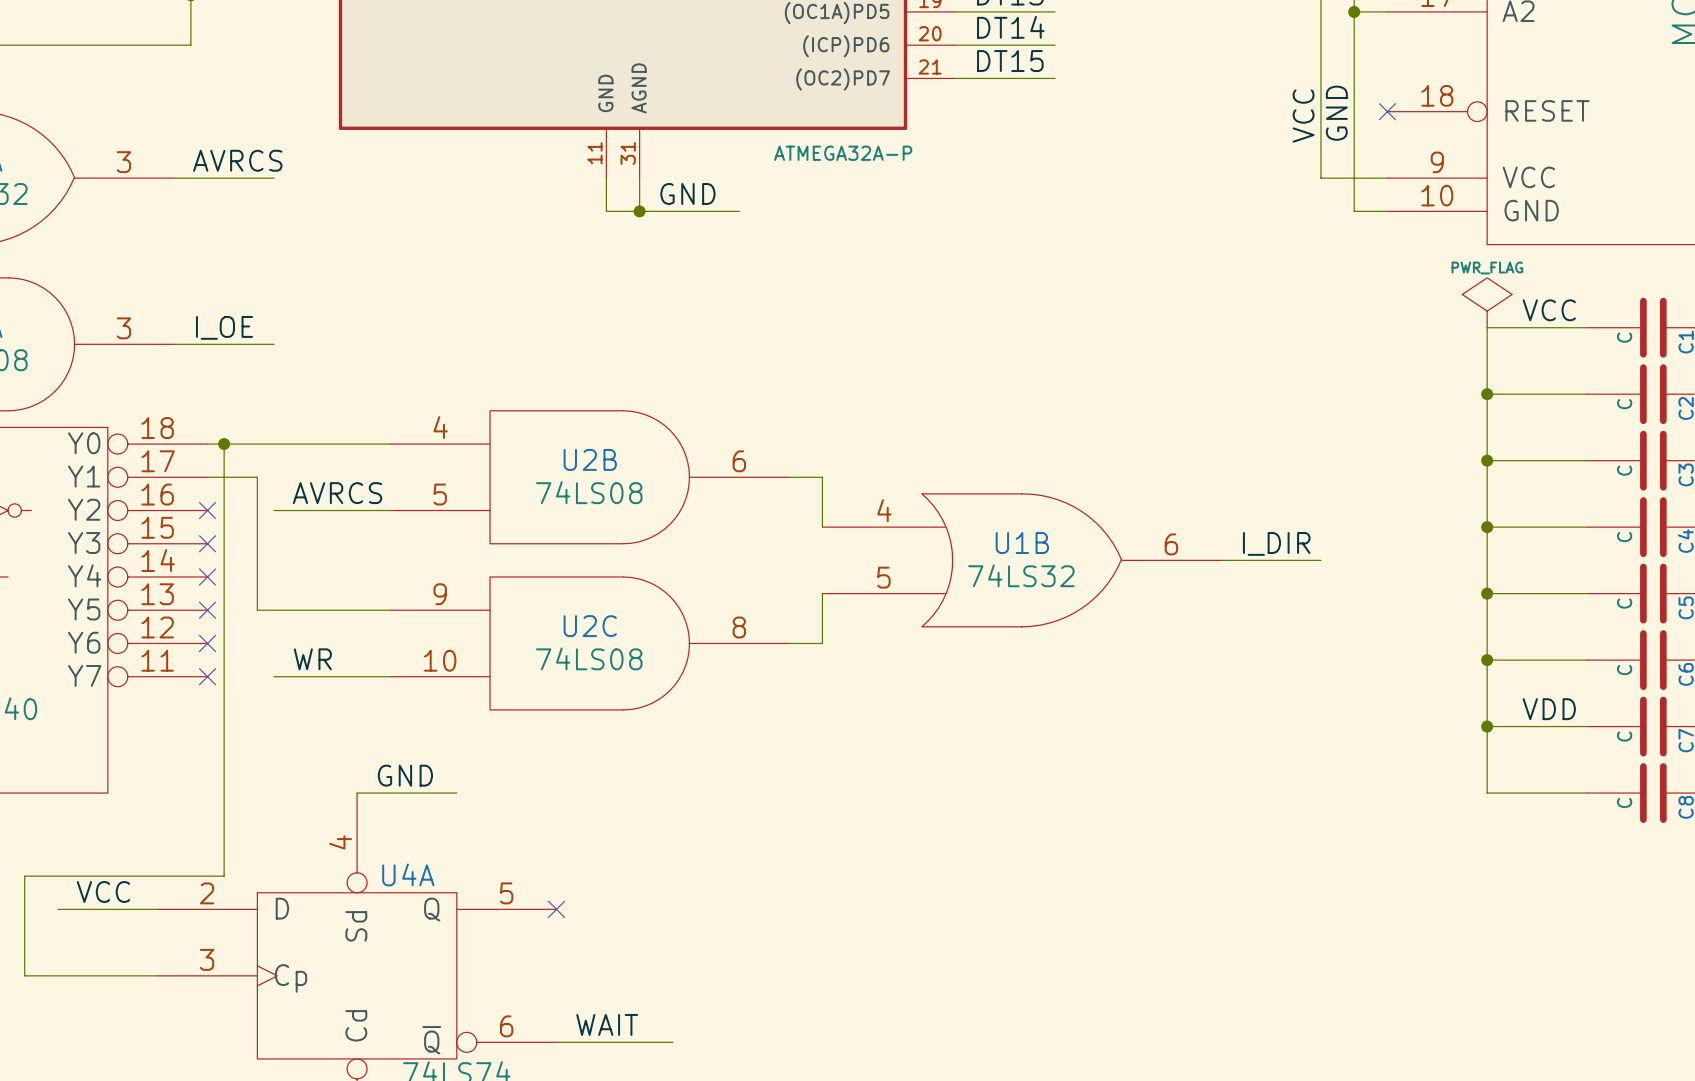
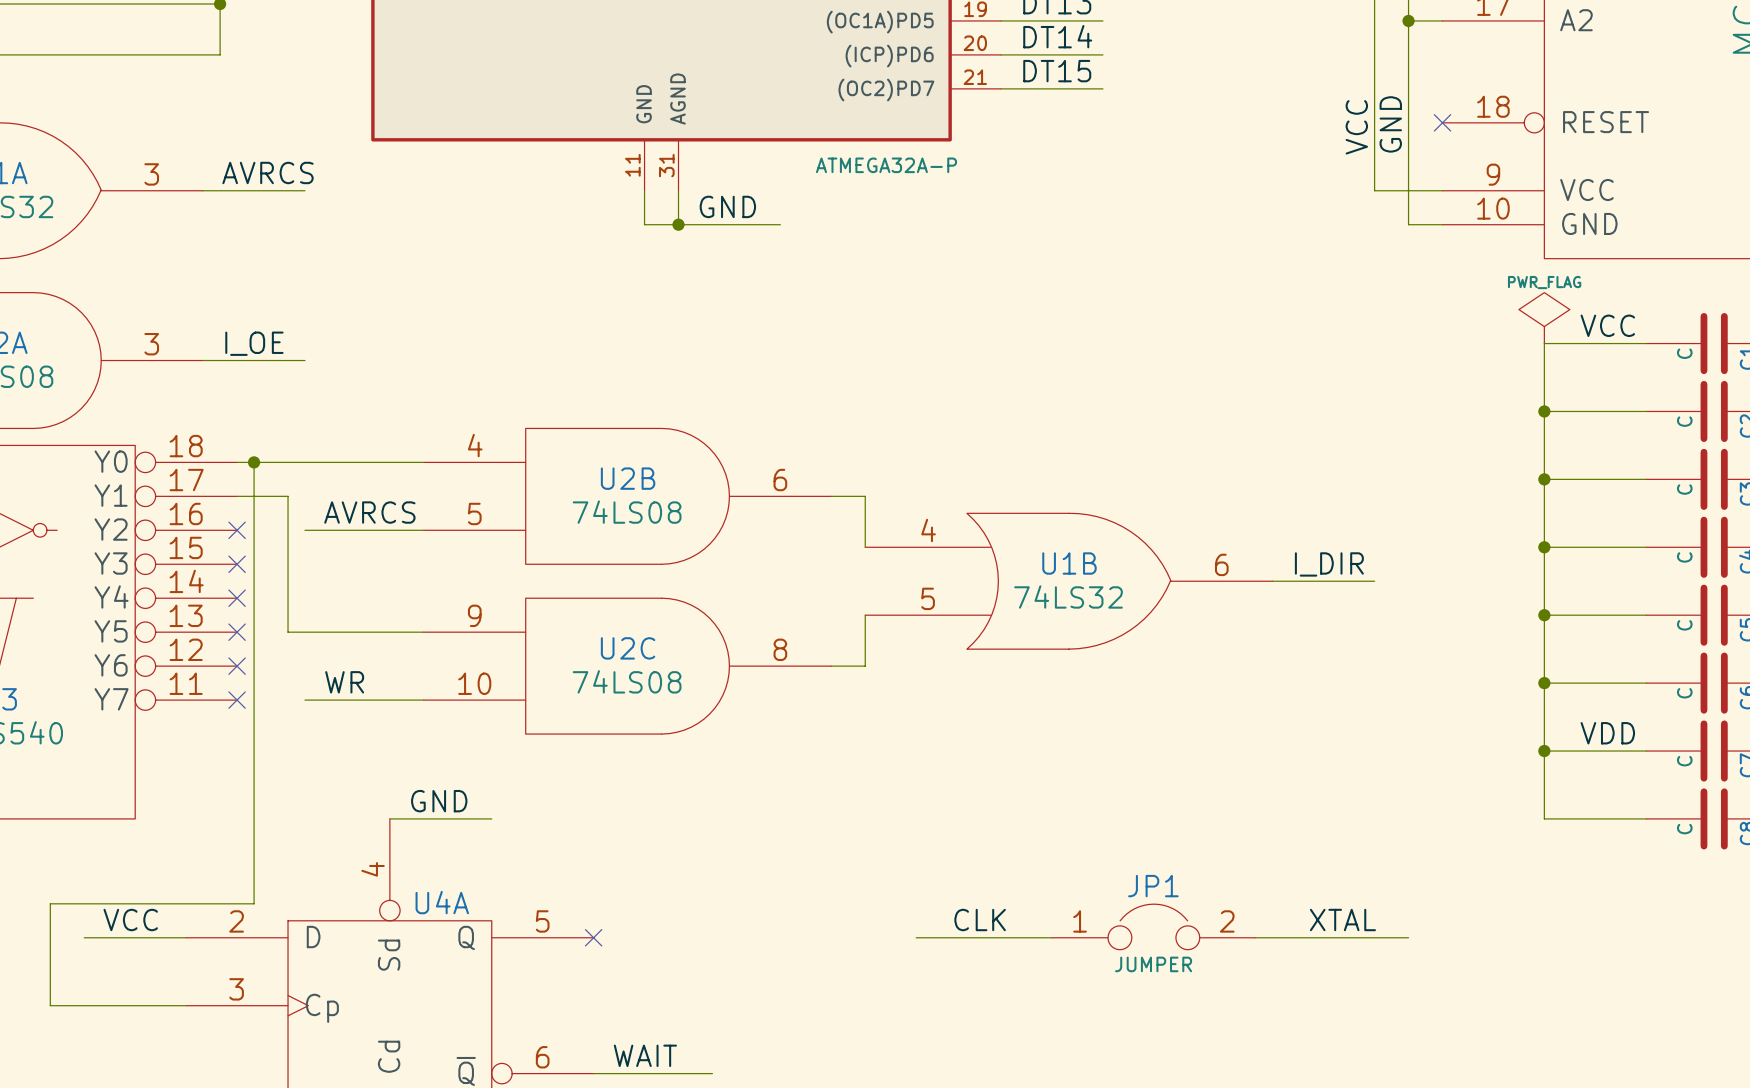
label: none -> CLK (980, 920)
label: none -> XTAL (1342, 920)
JP1: none -> JUMPER (1153, 926)
wire: none -> (916, 937) (1052, 937)
wire: none -> (1255, 937) (1408, 937)

